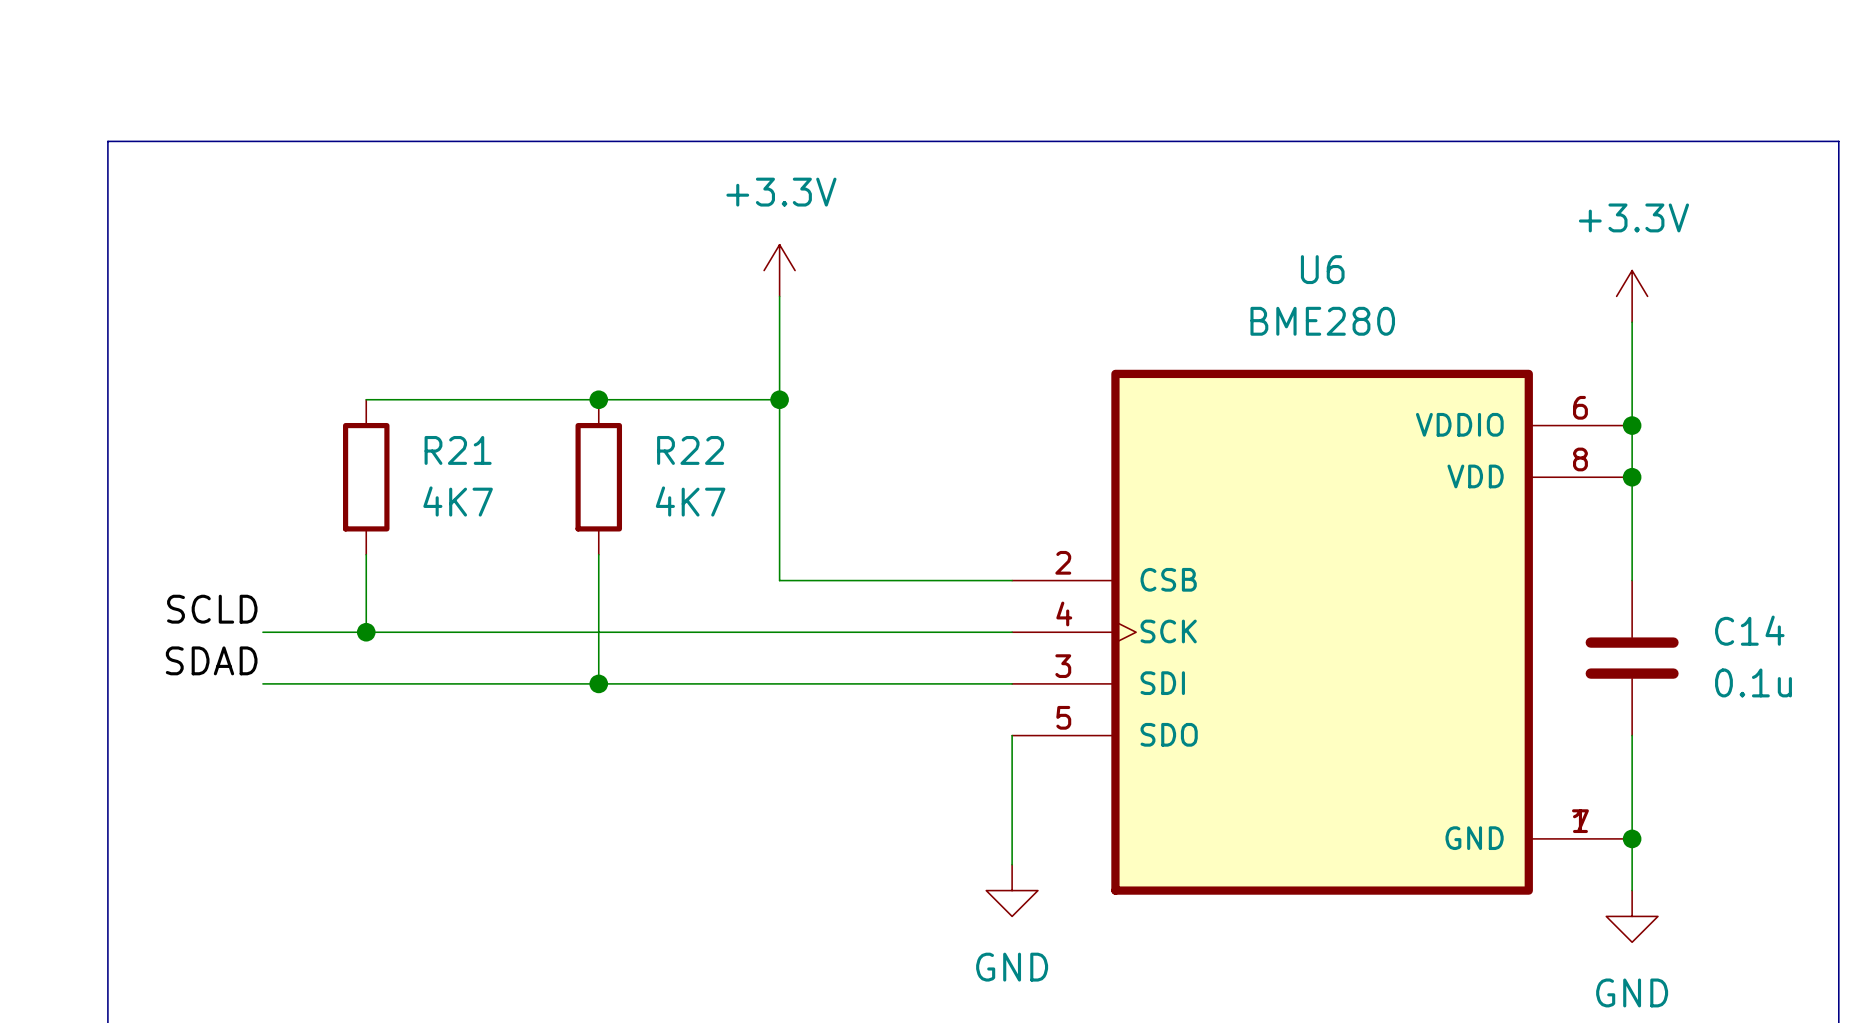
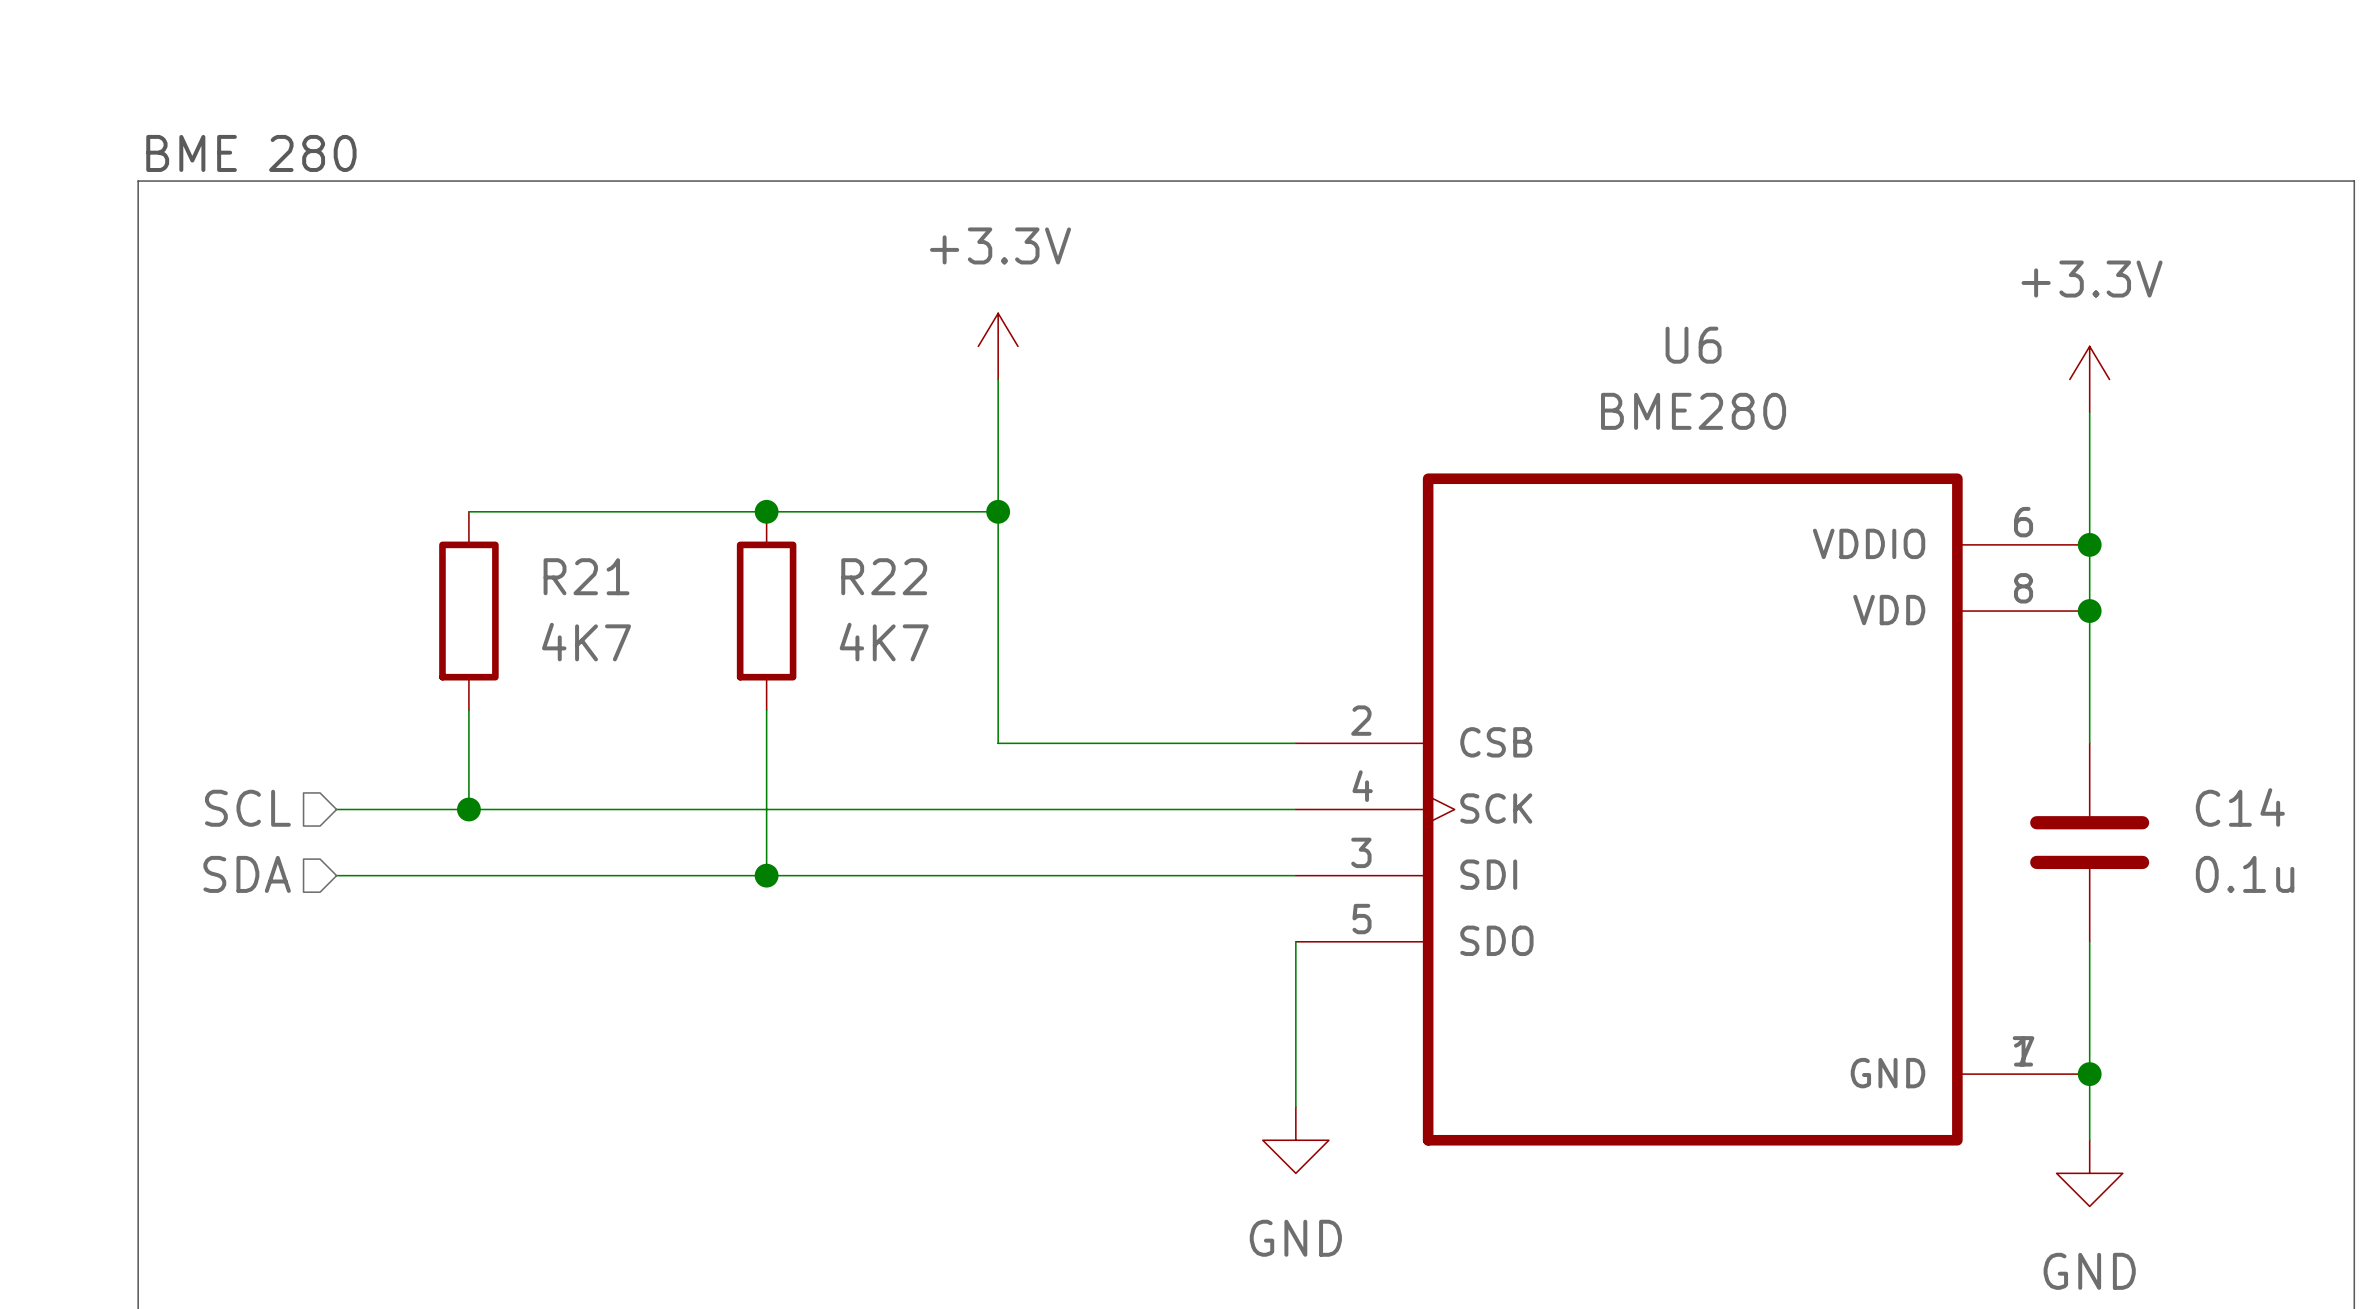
text: none -> BME 280 (251, 153)
label: SCLD (212, 609) -> none
hierarchical label: none -> SCL (247, 808)
label: SDAD (211, 660) -> none
hierarchical label: none -> SDA (247, 874)

